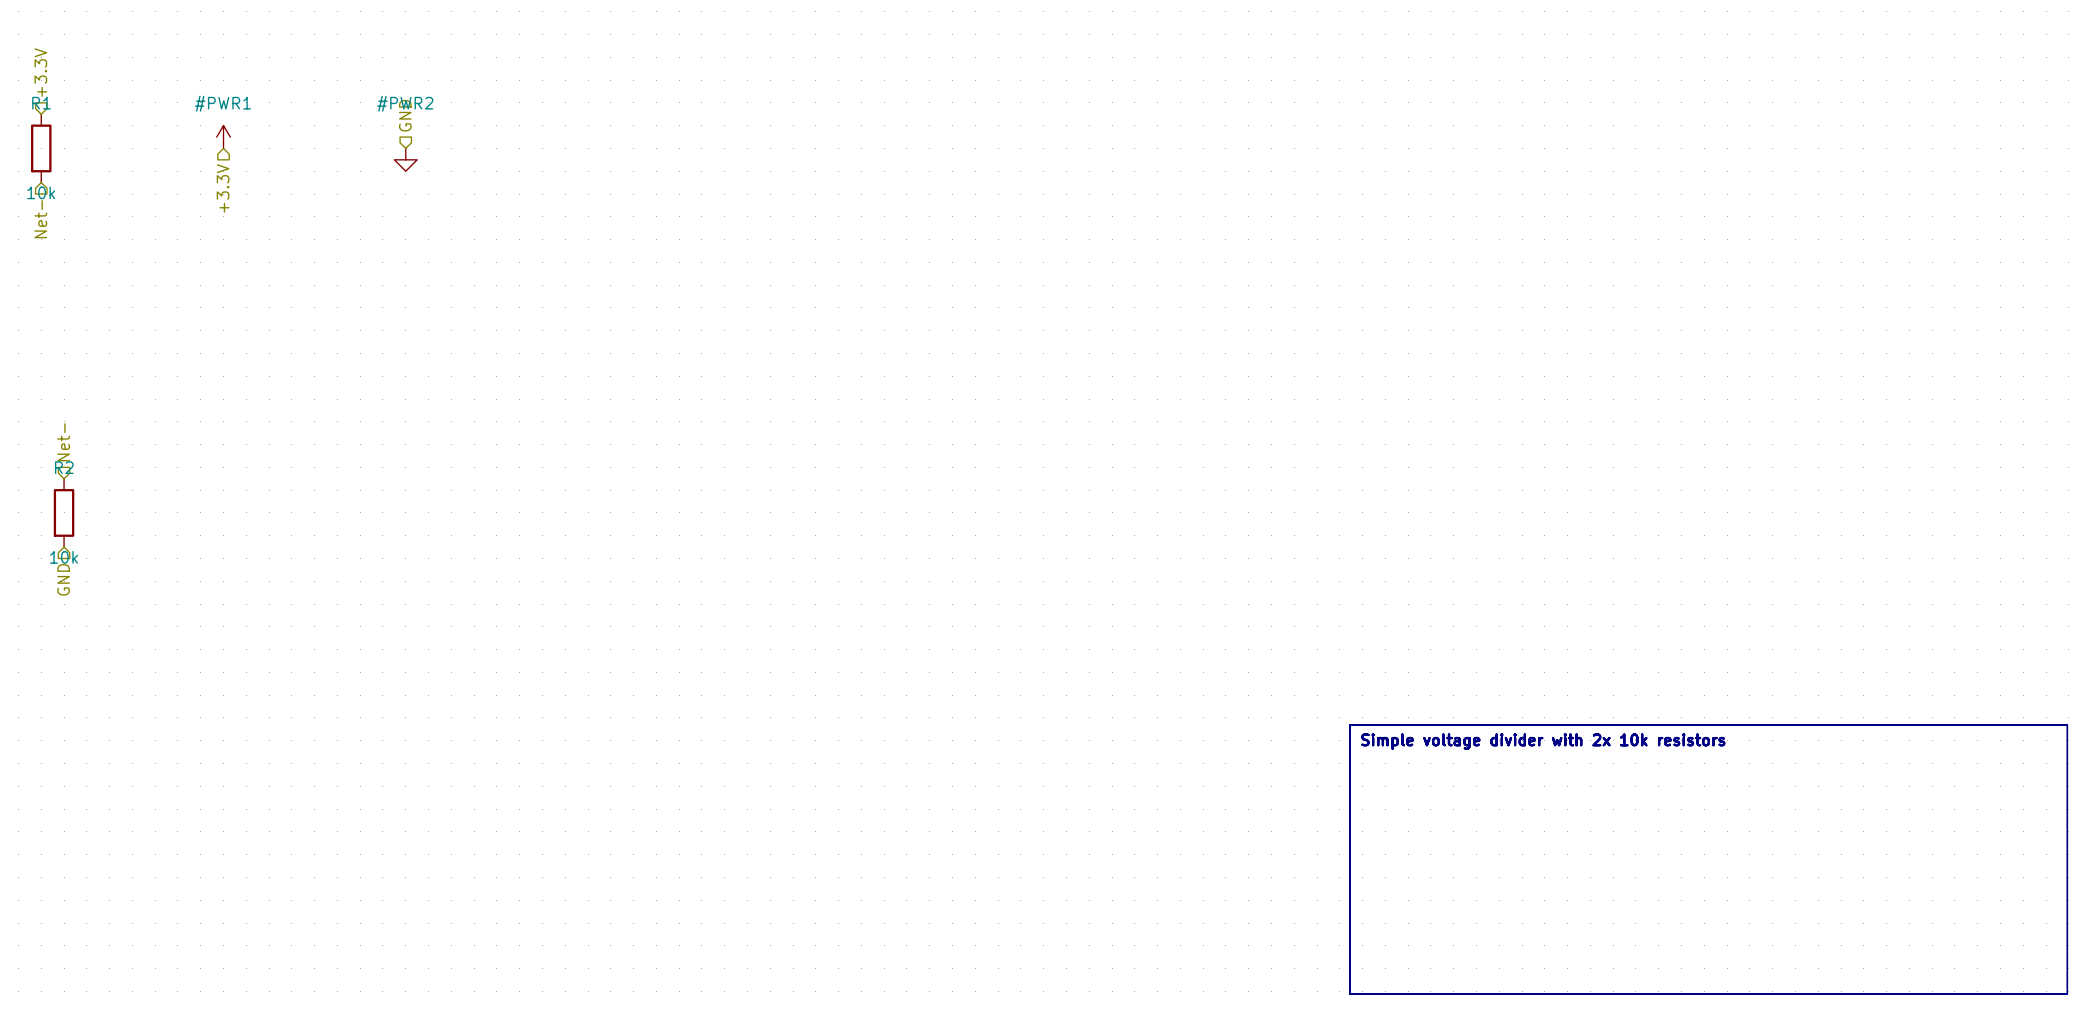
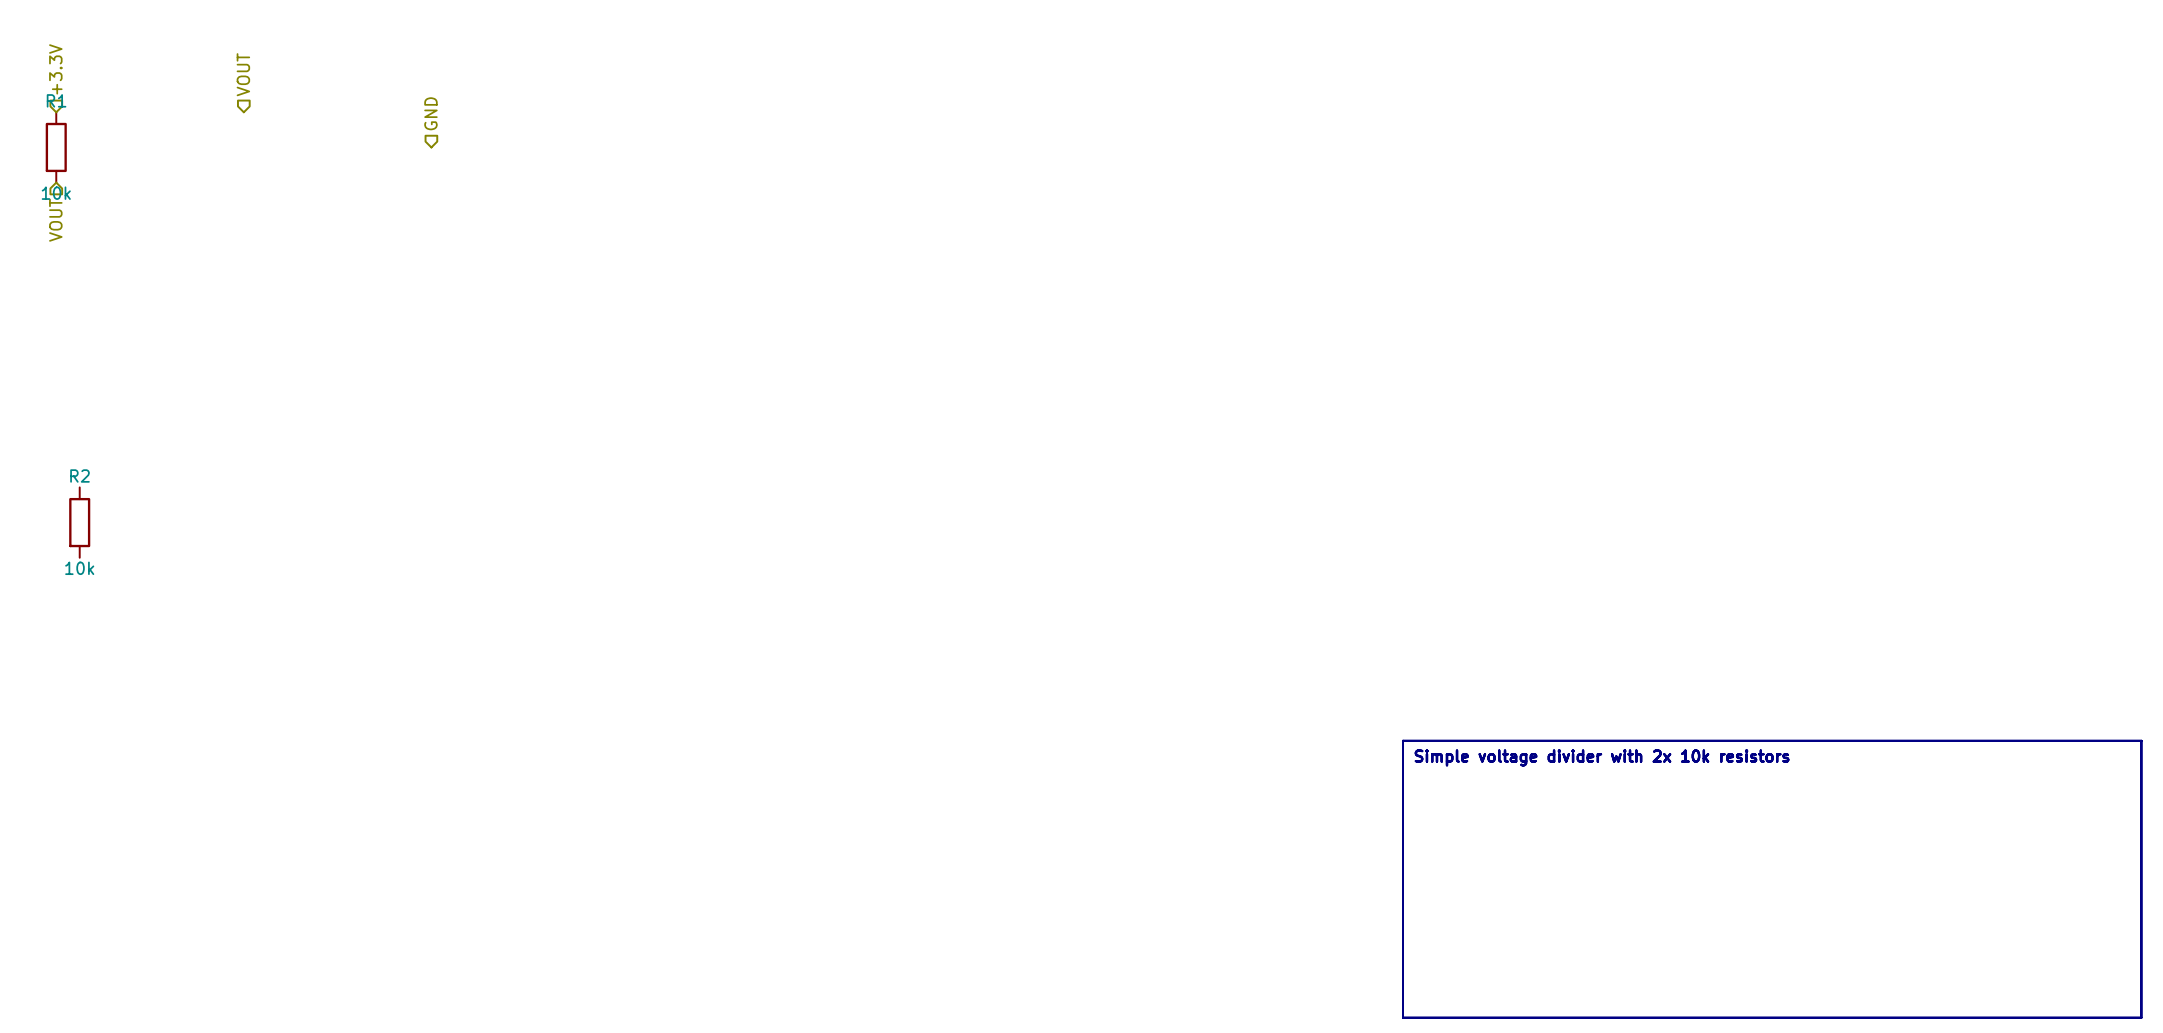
hierarchical label: none -> VOUT (243, 74)
#PWR1: (223, 137) -> none
#PWR2: (405, 159) -> none
hierarchical label: +3.3V (223, 188) -> none
hierarchical label: Net- (40, 219) -> VOUT (55, 220)
hierarchical label: Net- (63, 442) -> none
hierarchical label: GND (63, 579) -> none

